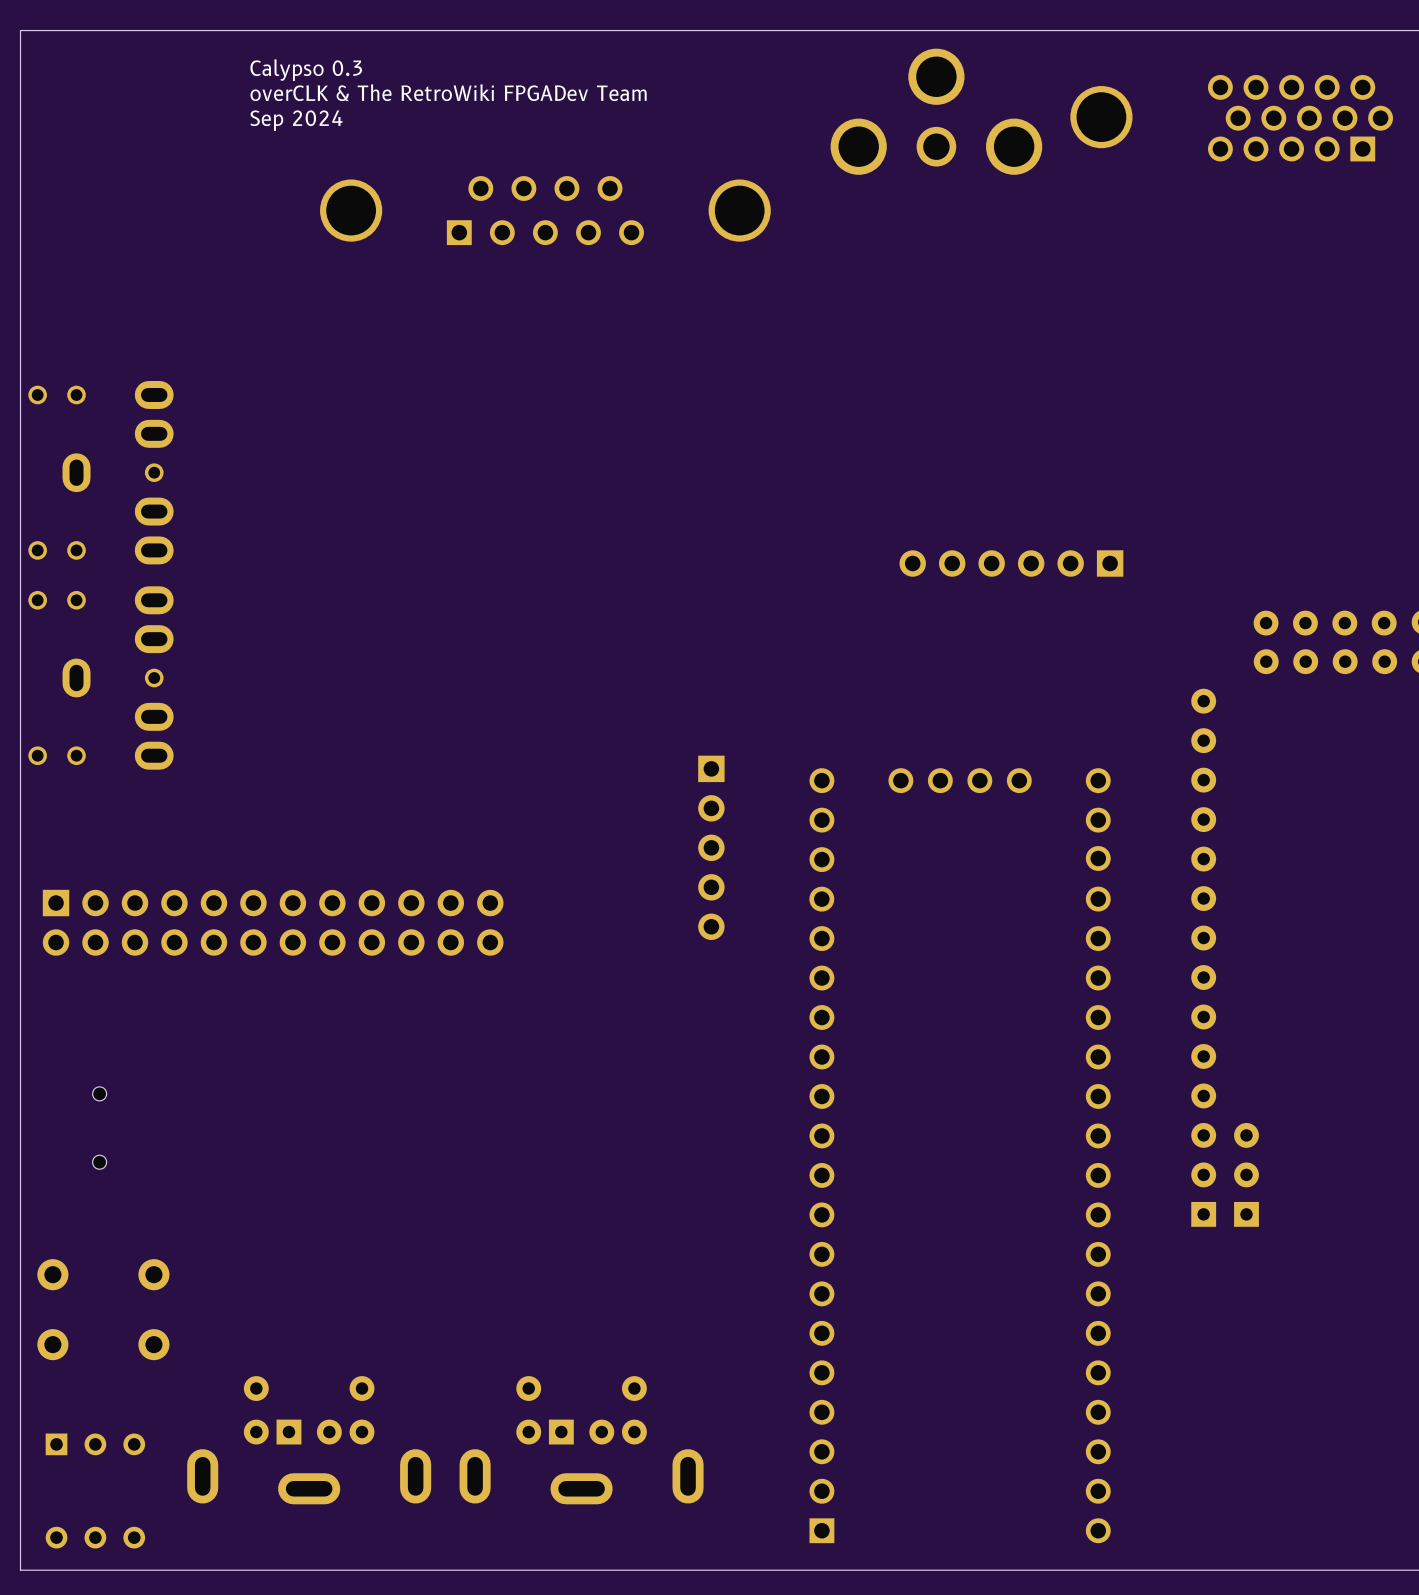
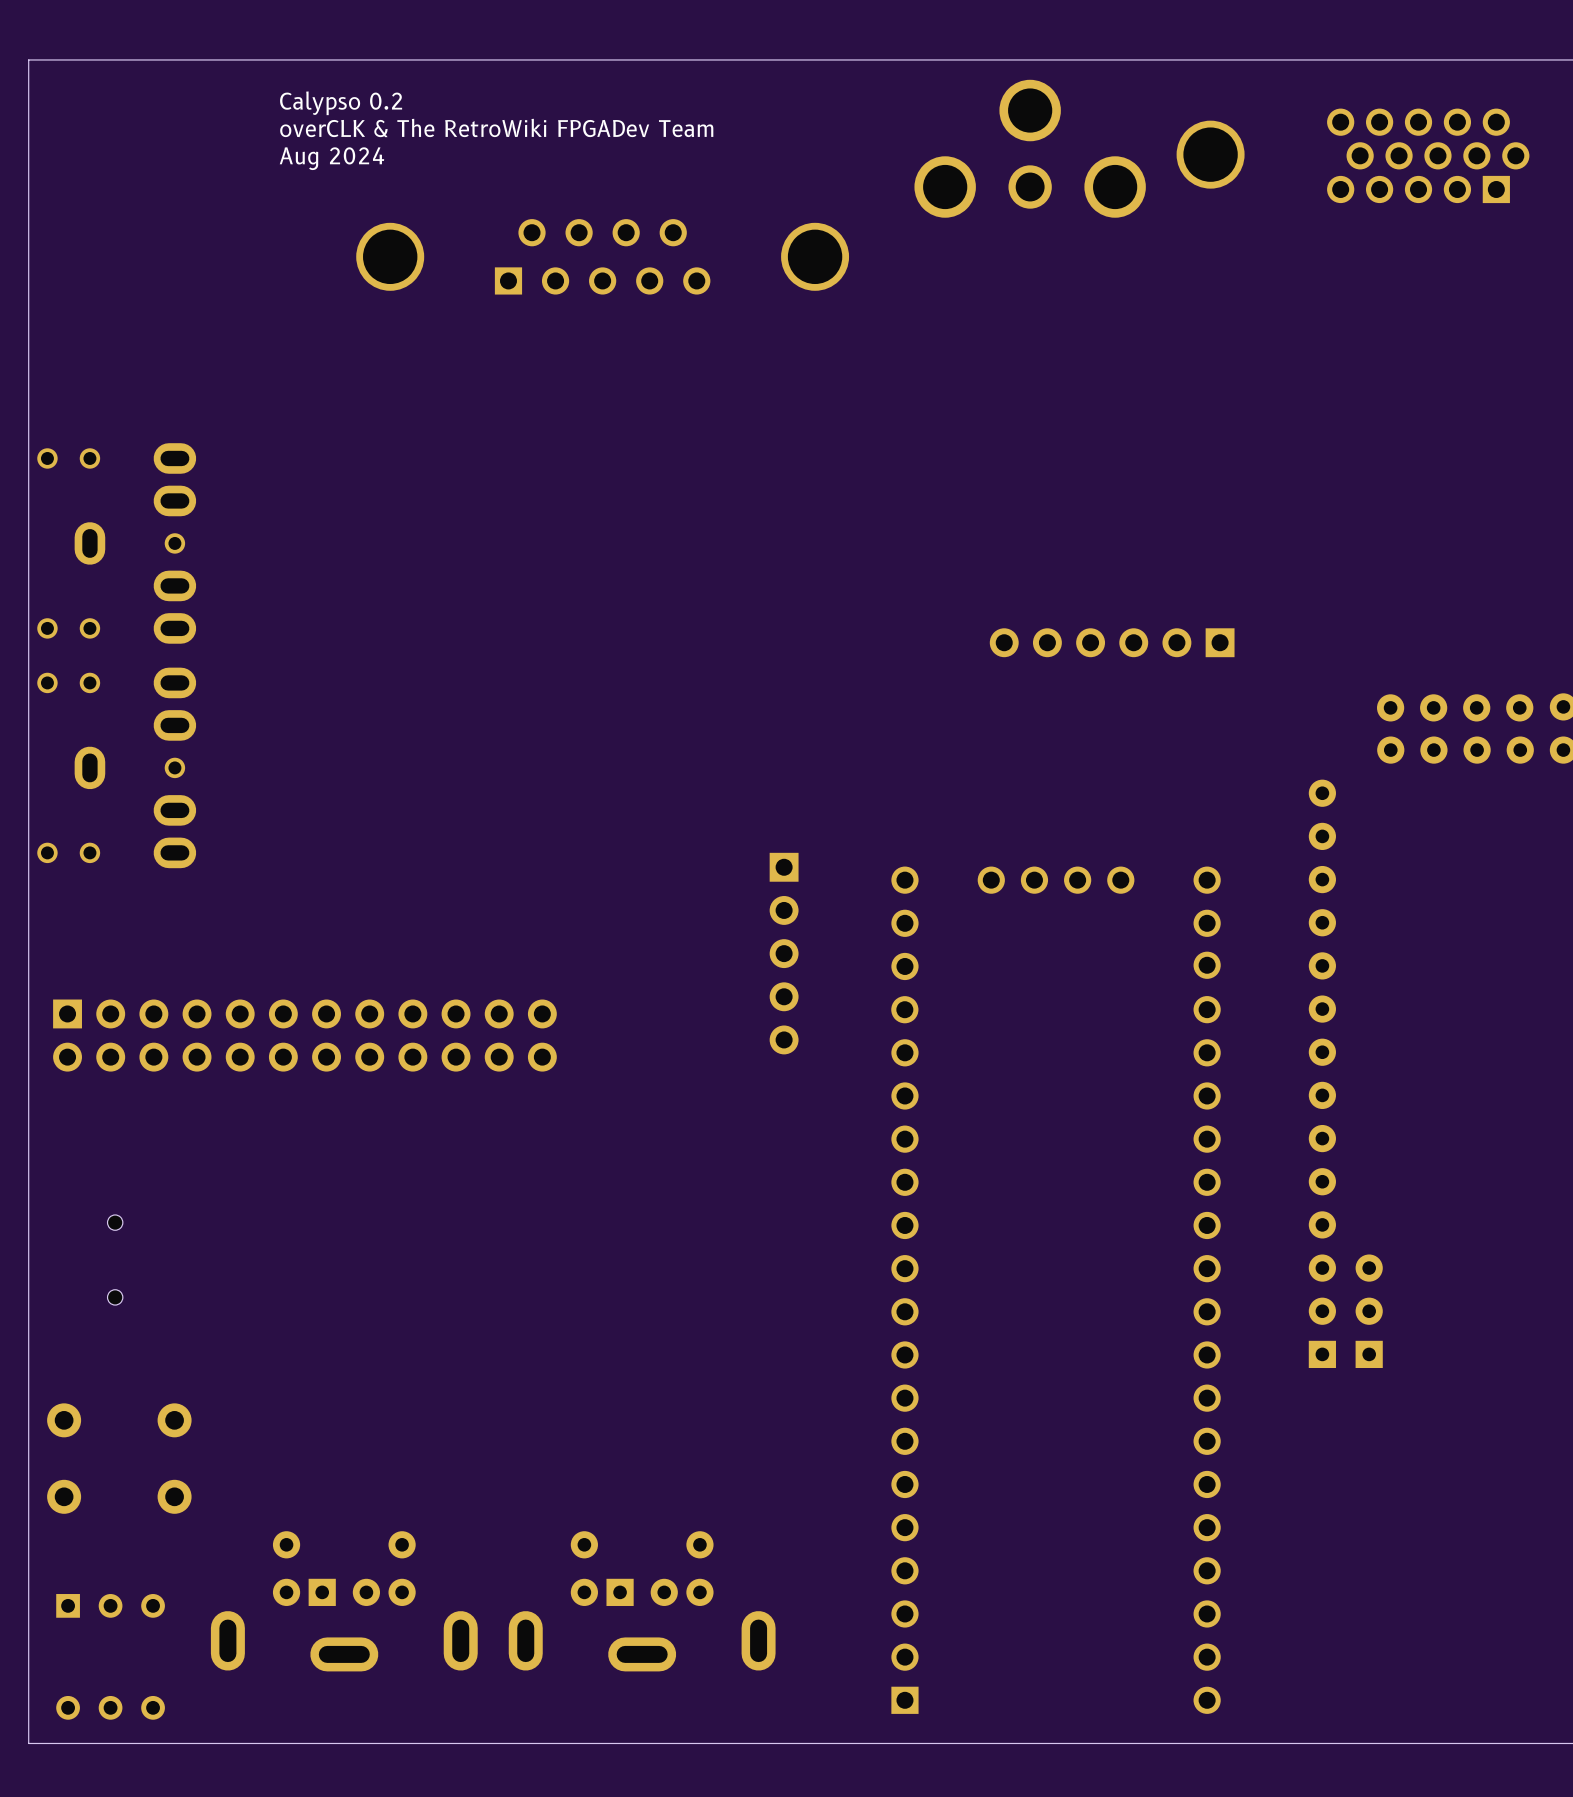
text: Calypso 0.3 (306, 70) -> Calypso 0.2 (341, 103)
text: Sep 2024 (296, 120) -> Aug 2024 (331, 158)

